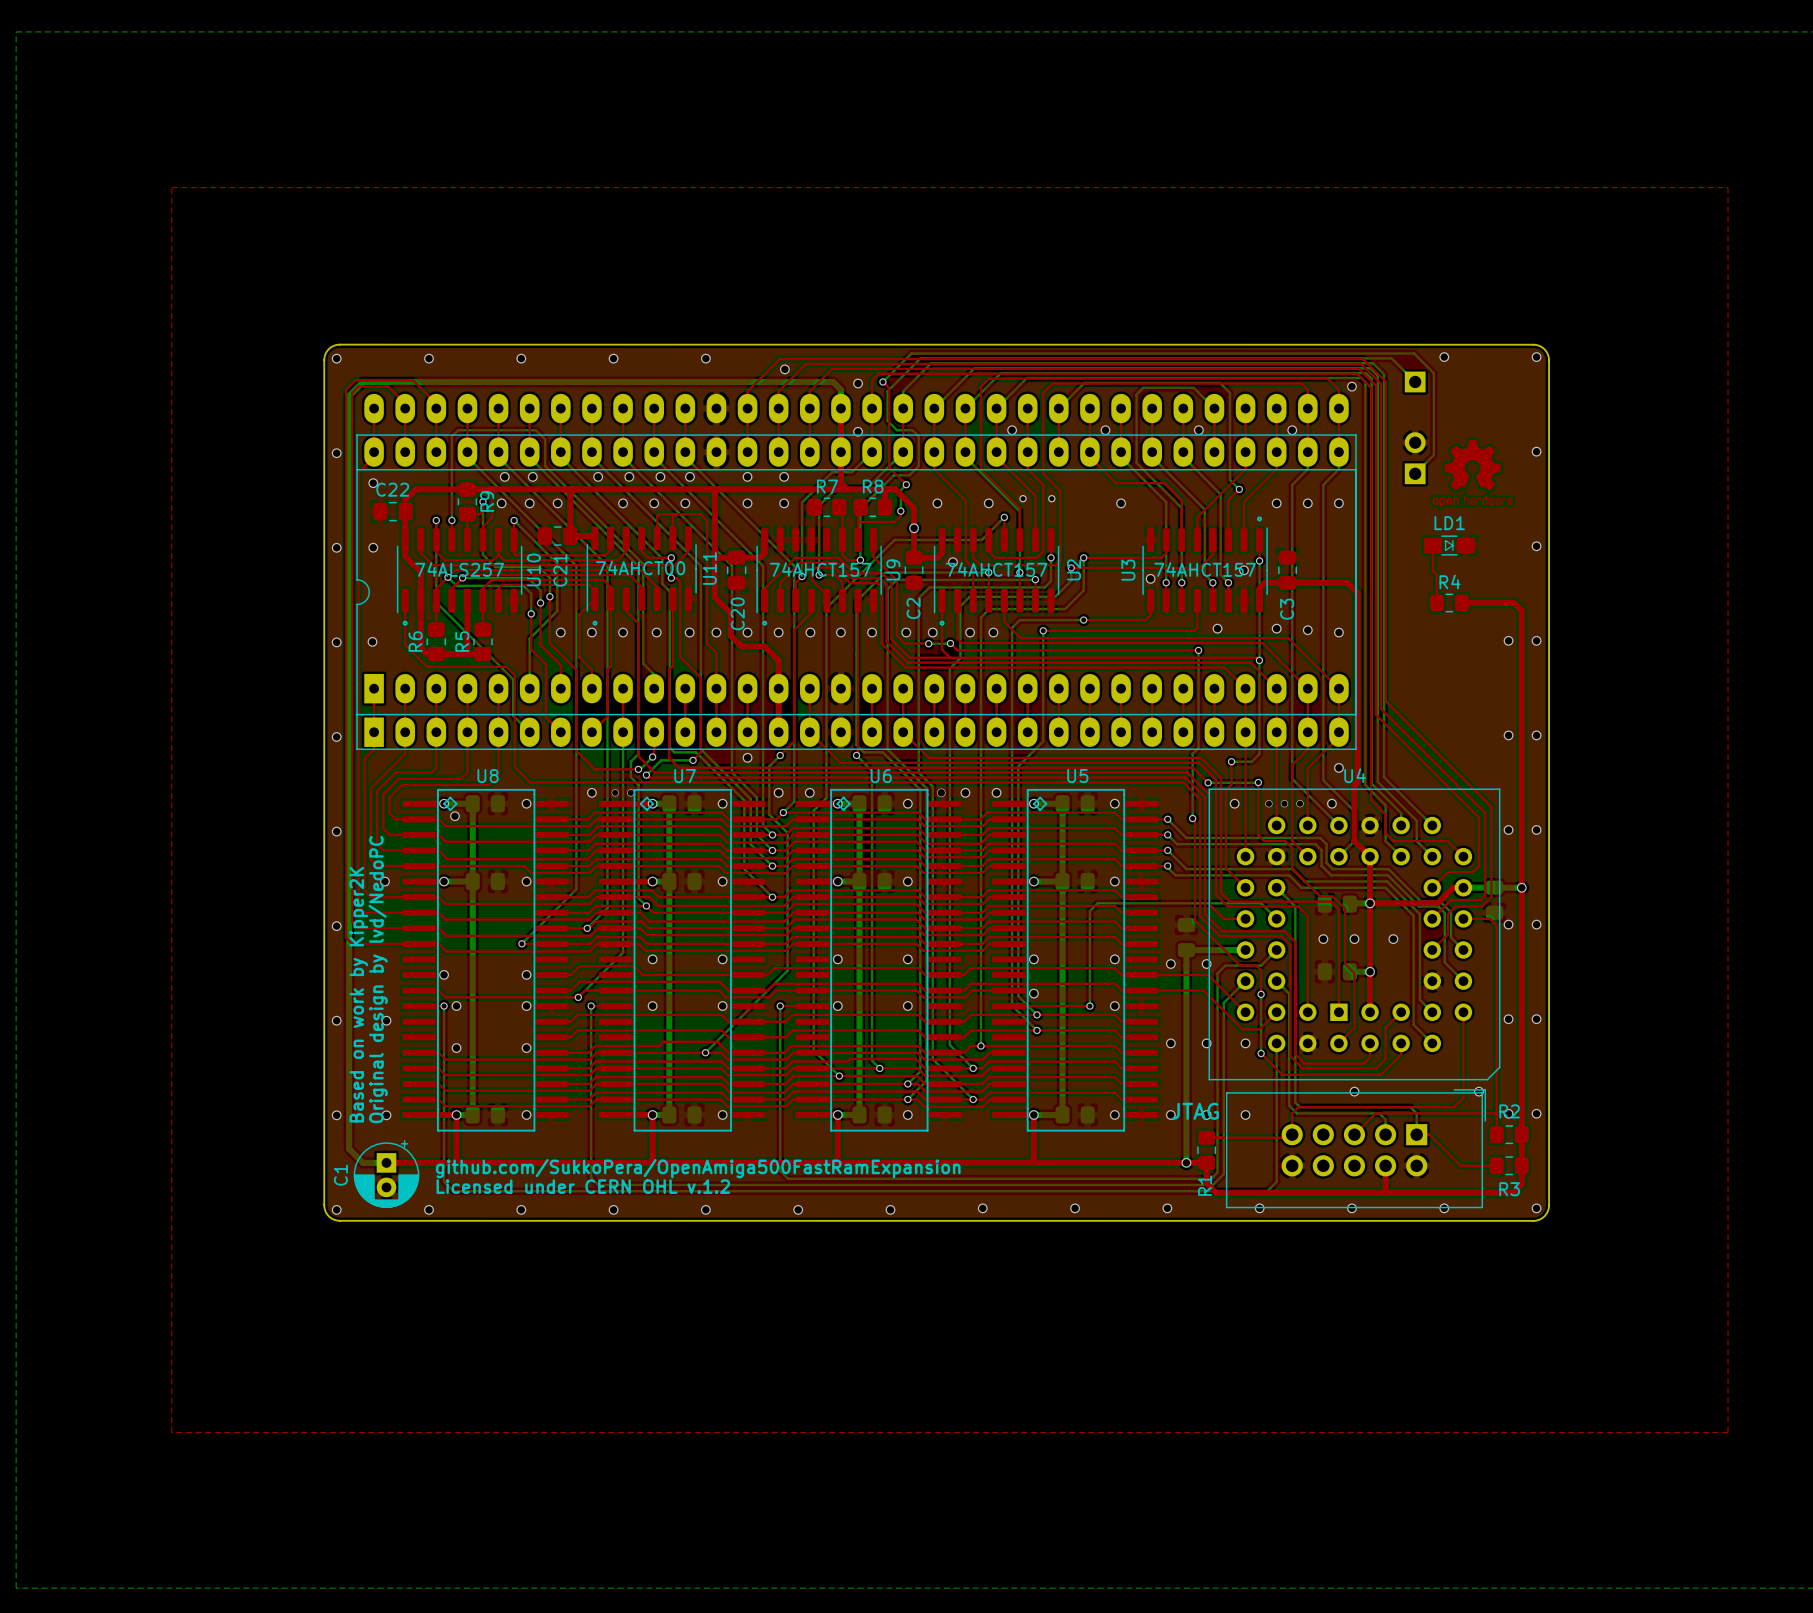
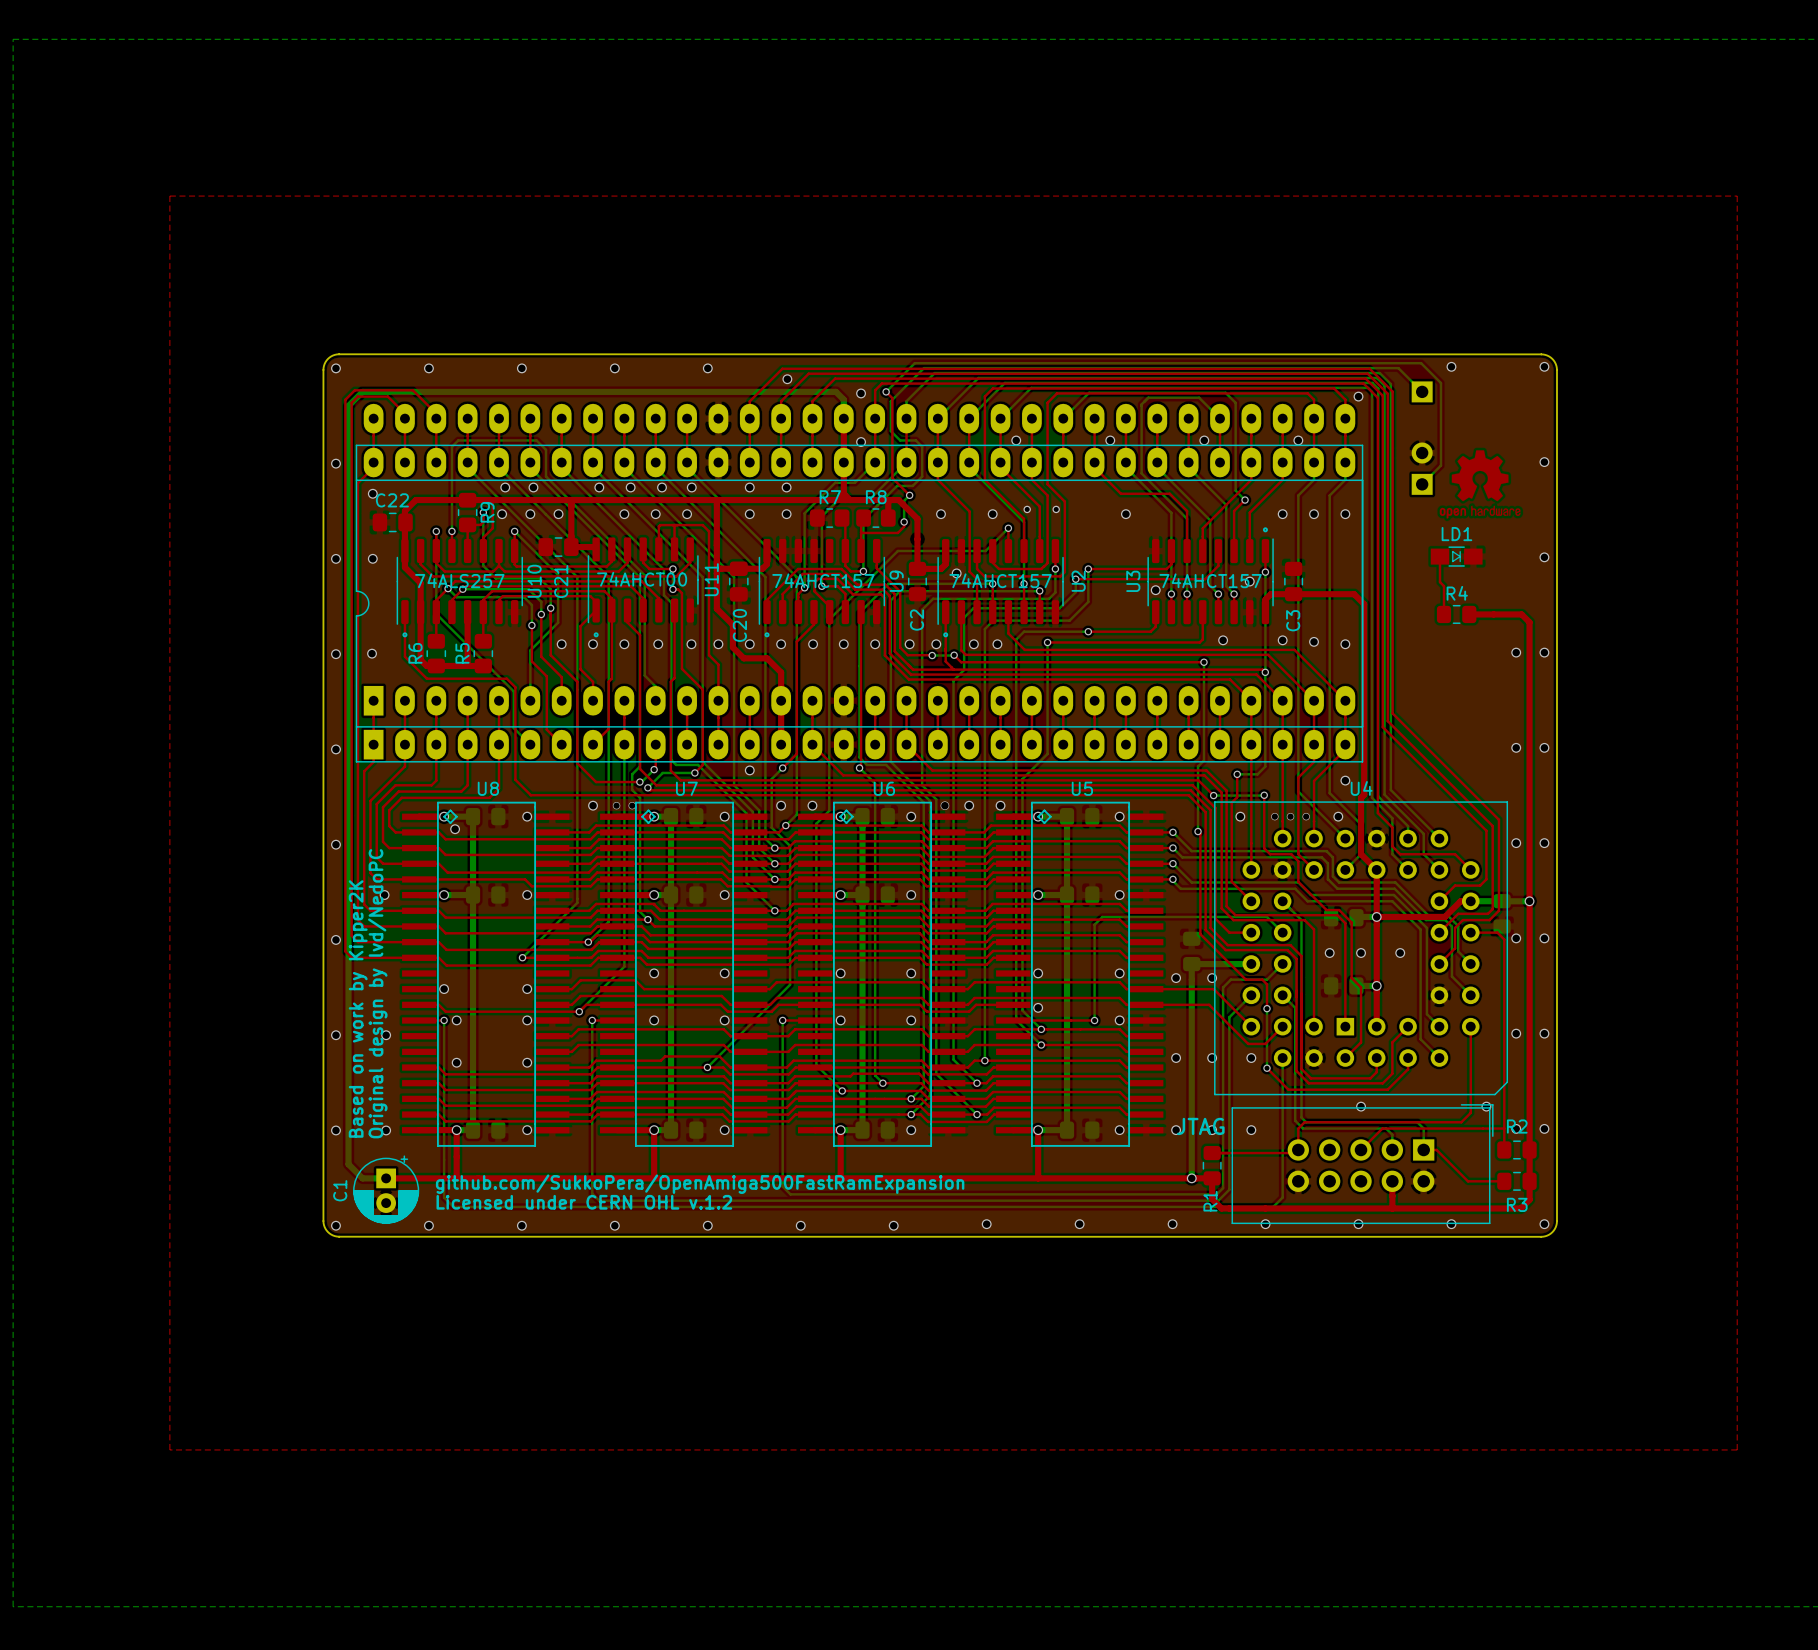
via: (914, 528) -> none

